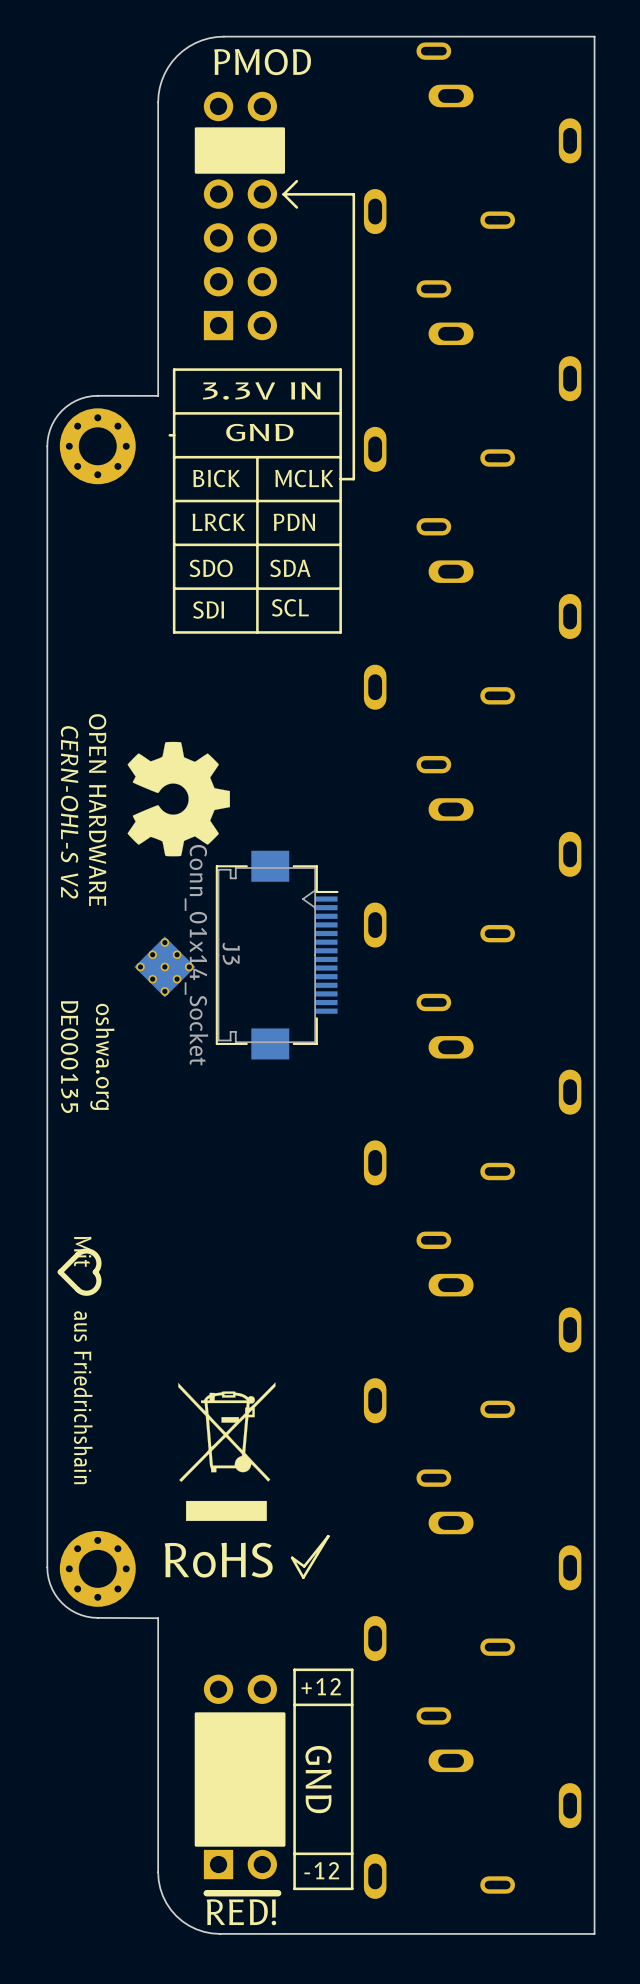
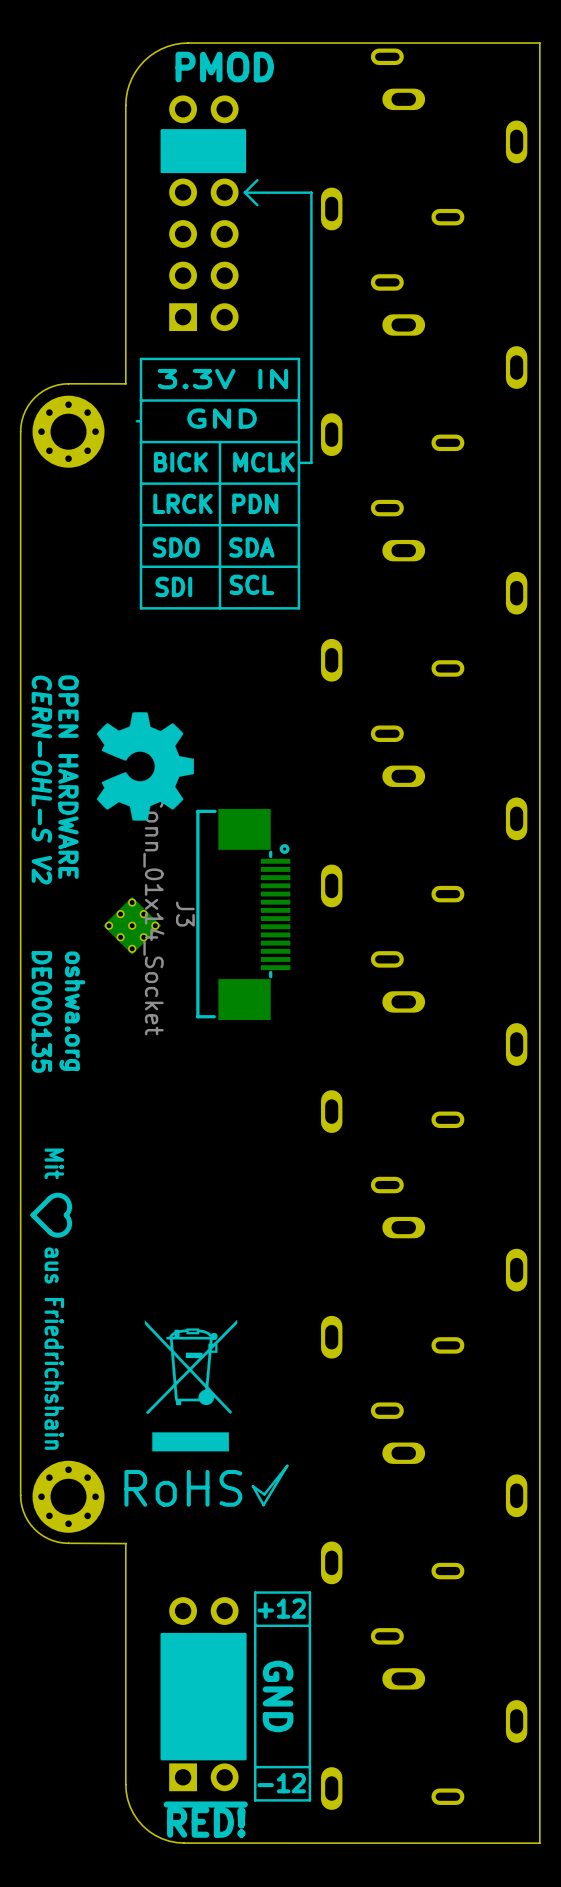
J3 footprint: [215, 850, 339, 1060] -> [196, 808, 291, 1021]

